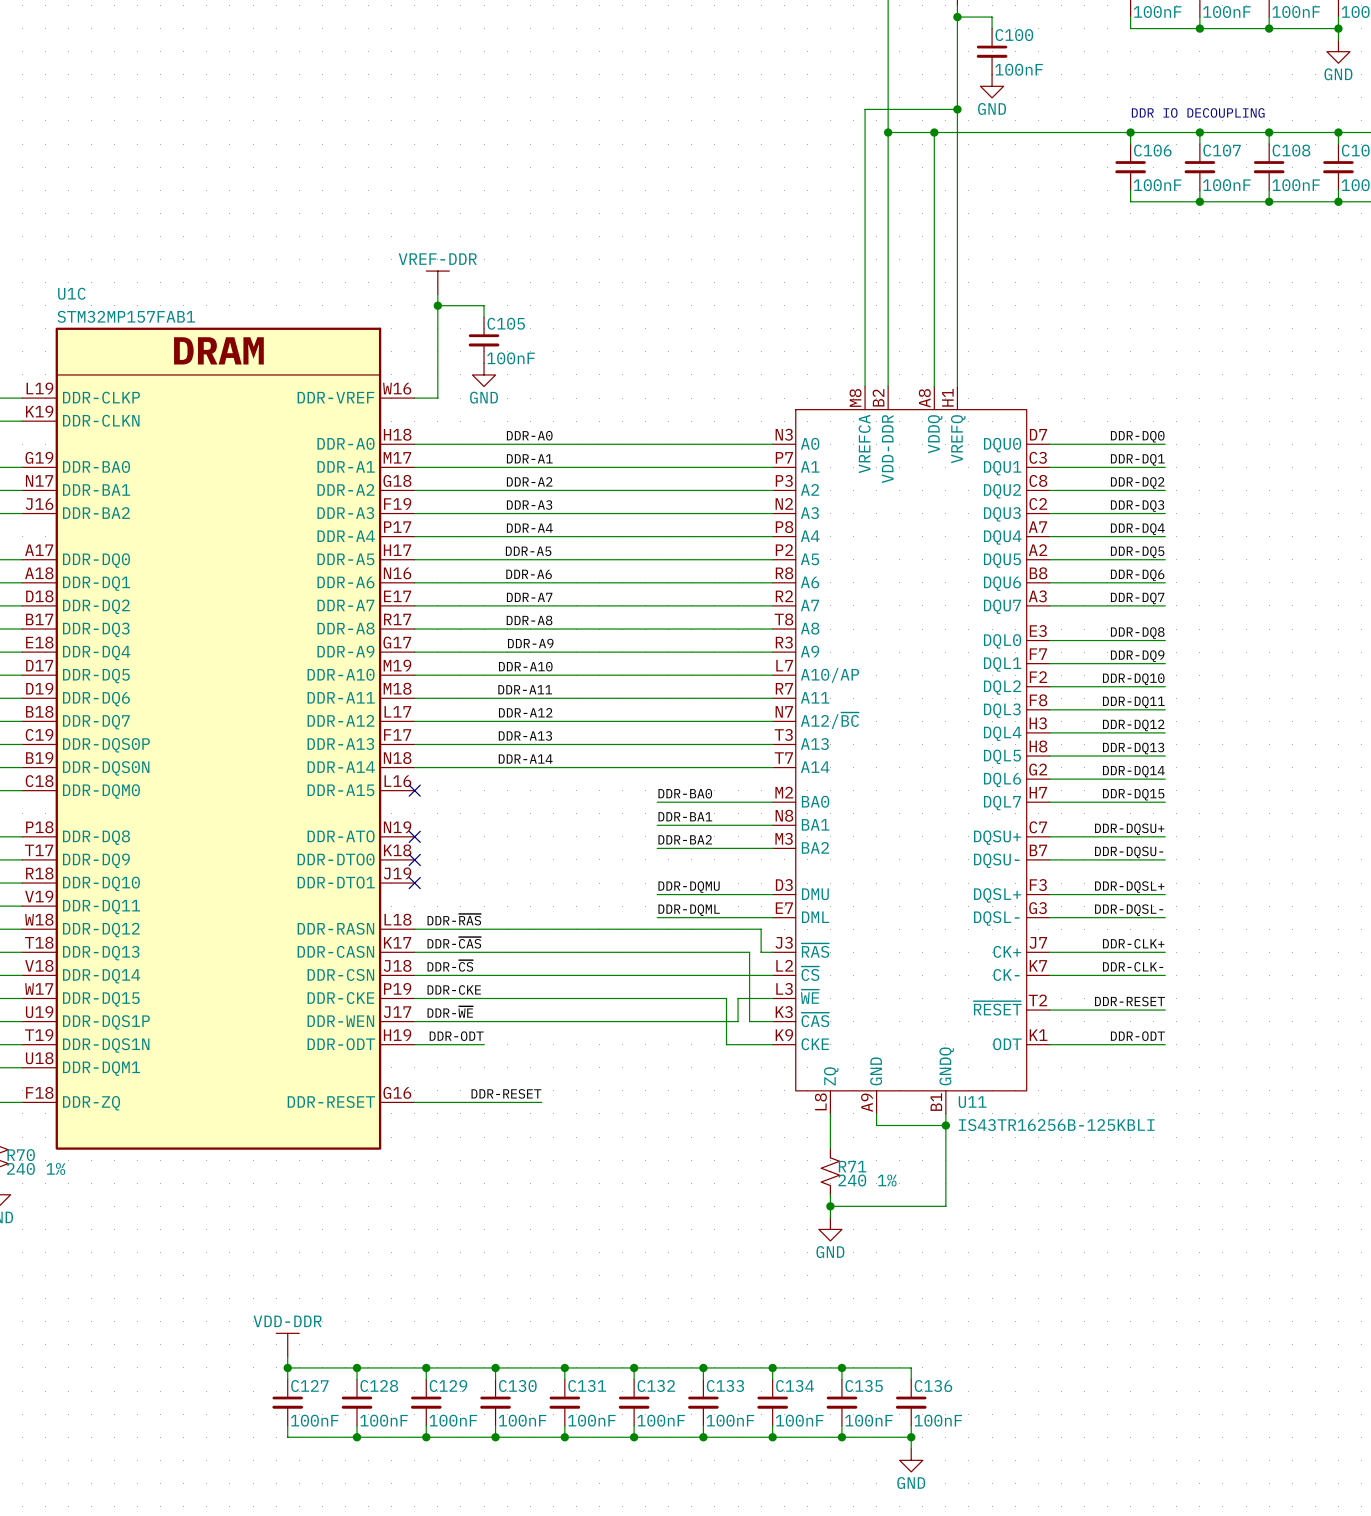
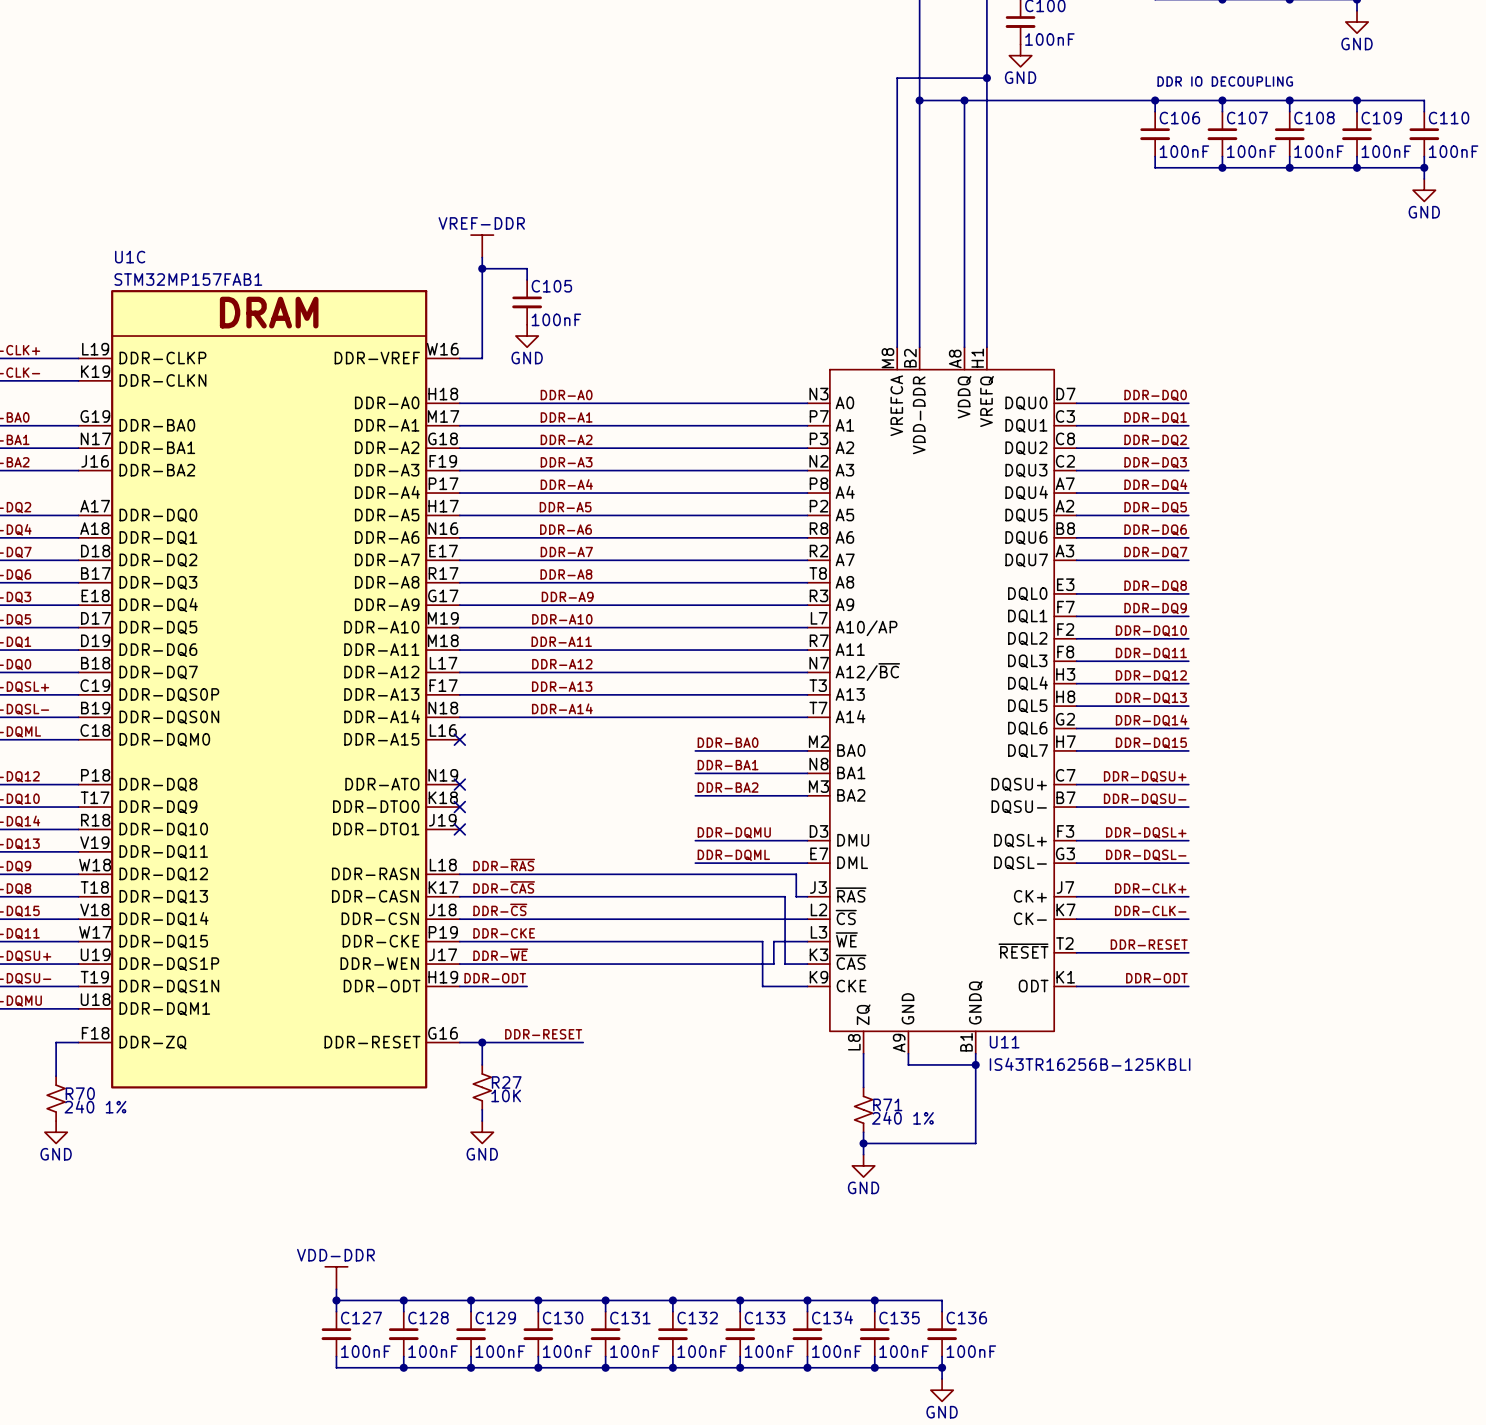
wire: none -> (482, 1042) (482, 1064)
junction: none -> (482, 1042)
R27: none -> 10K (482, 1087)
wire: none -> (482, 1109) (482, 1121)
power symbol: none -> GND (482, 1132)

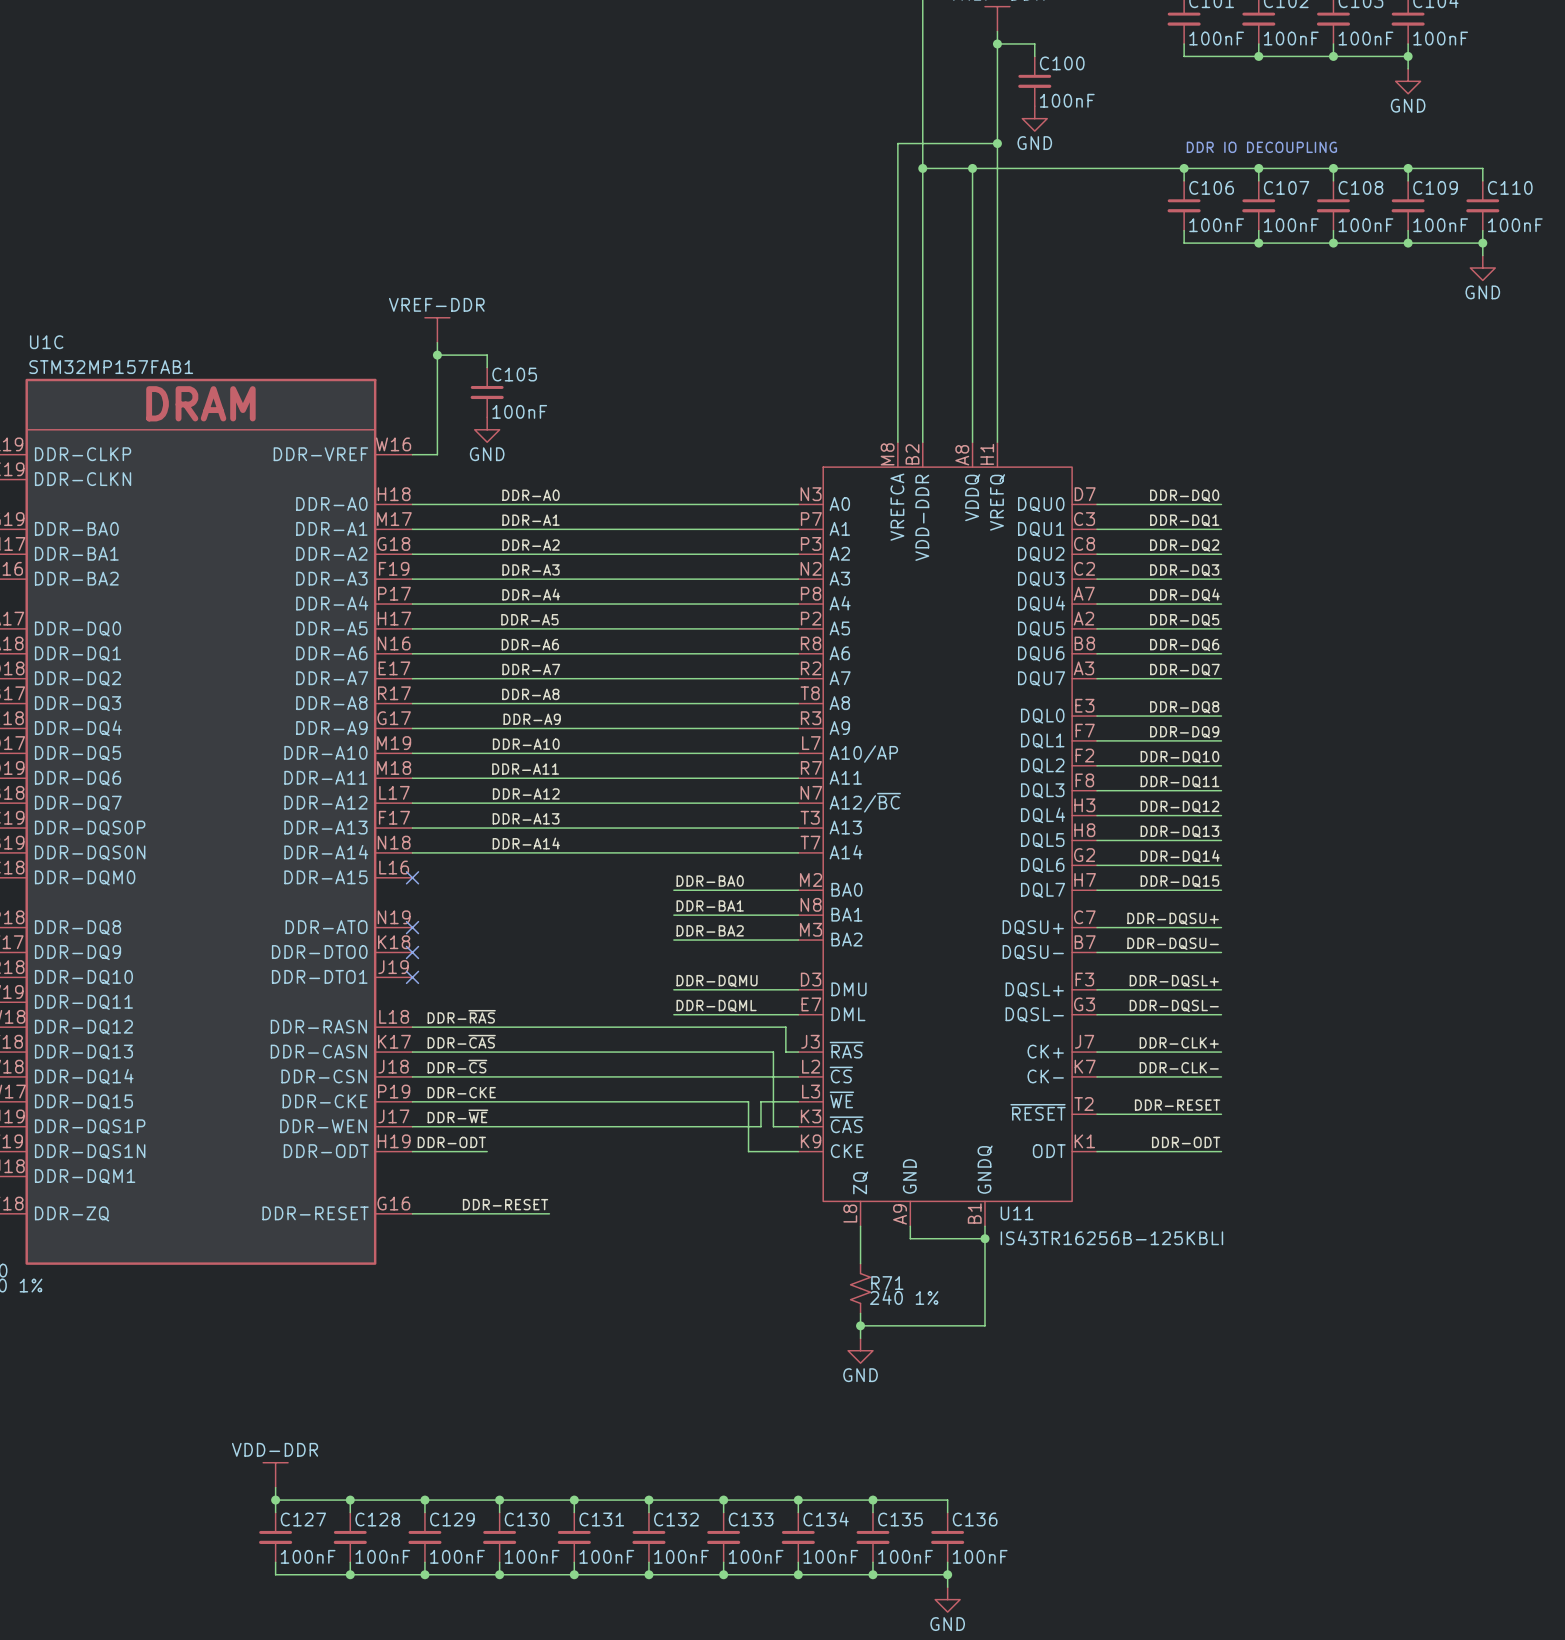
wire: (482, 1042) (482, 1064) -> none
junction: (482, 1042) -> none
R27: 10K (482, 1087) -> none
wire: (482, 1109) (482, 1121) -> none
power symbol: GND (482, 1132) -> none

